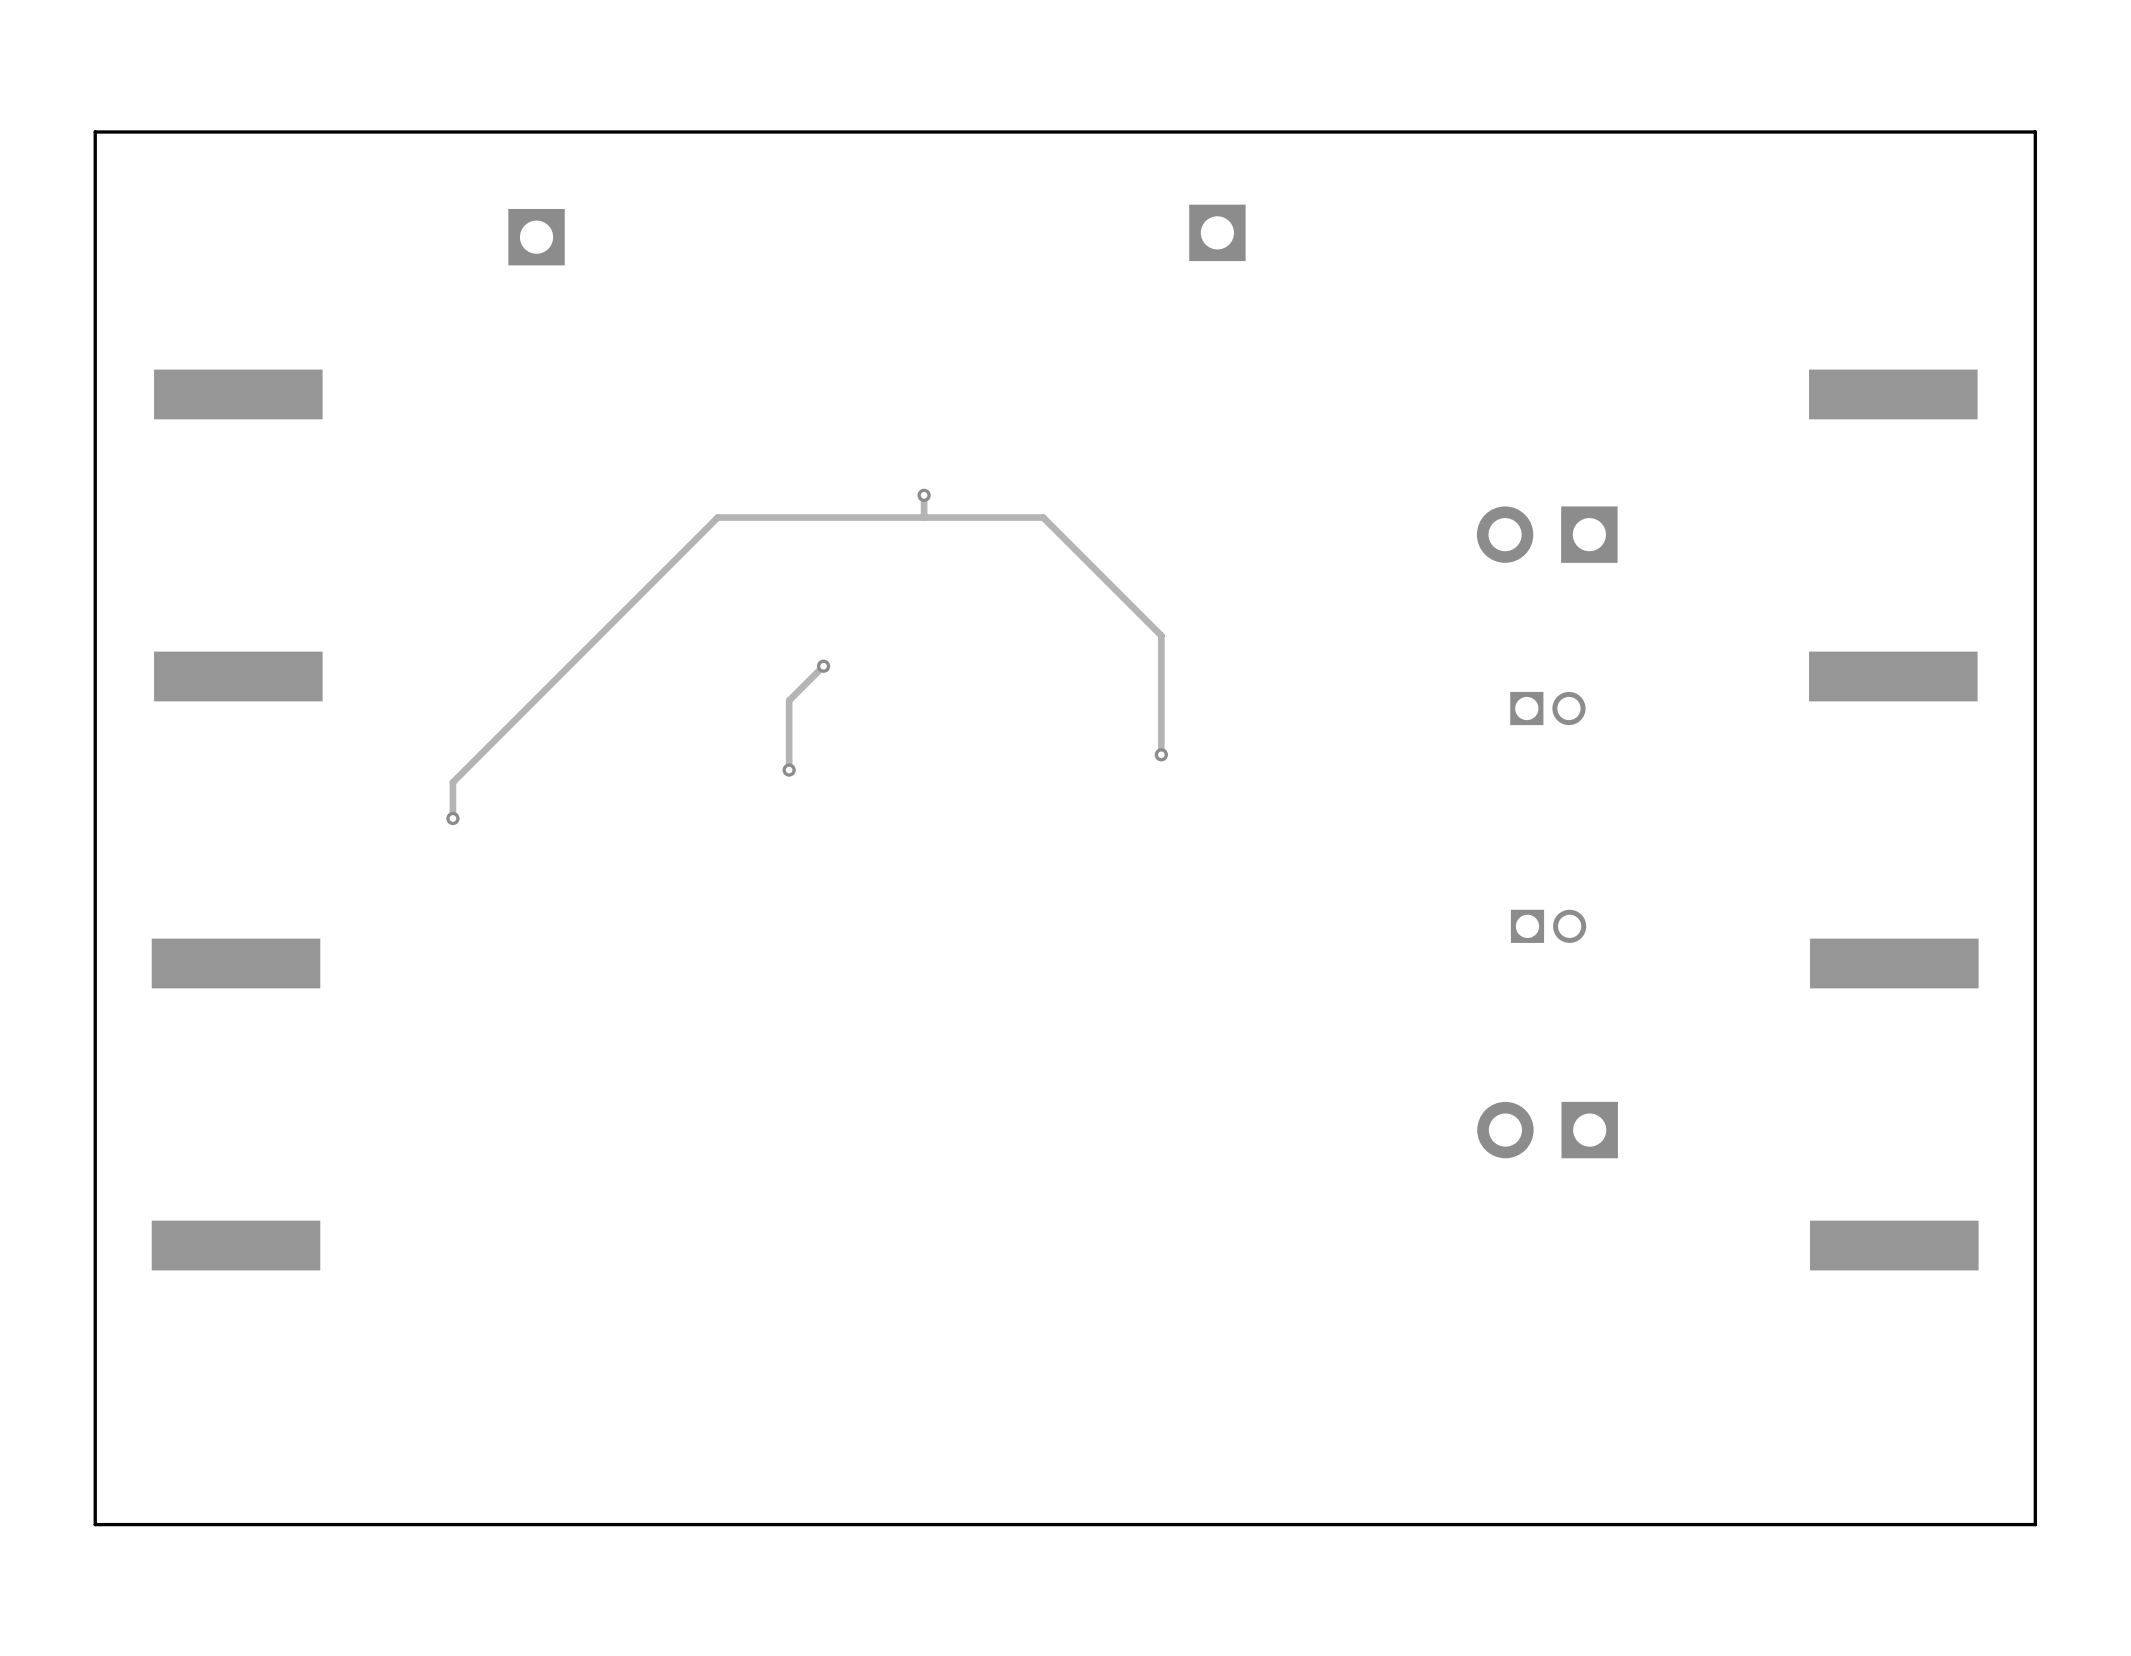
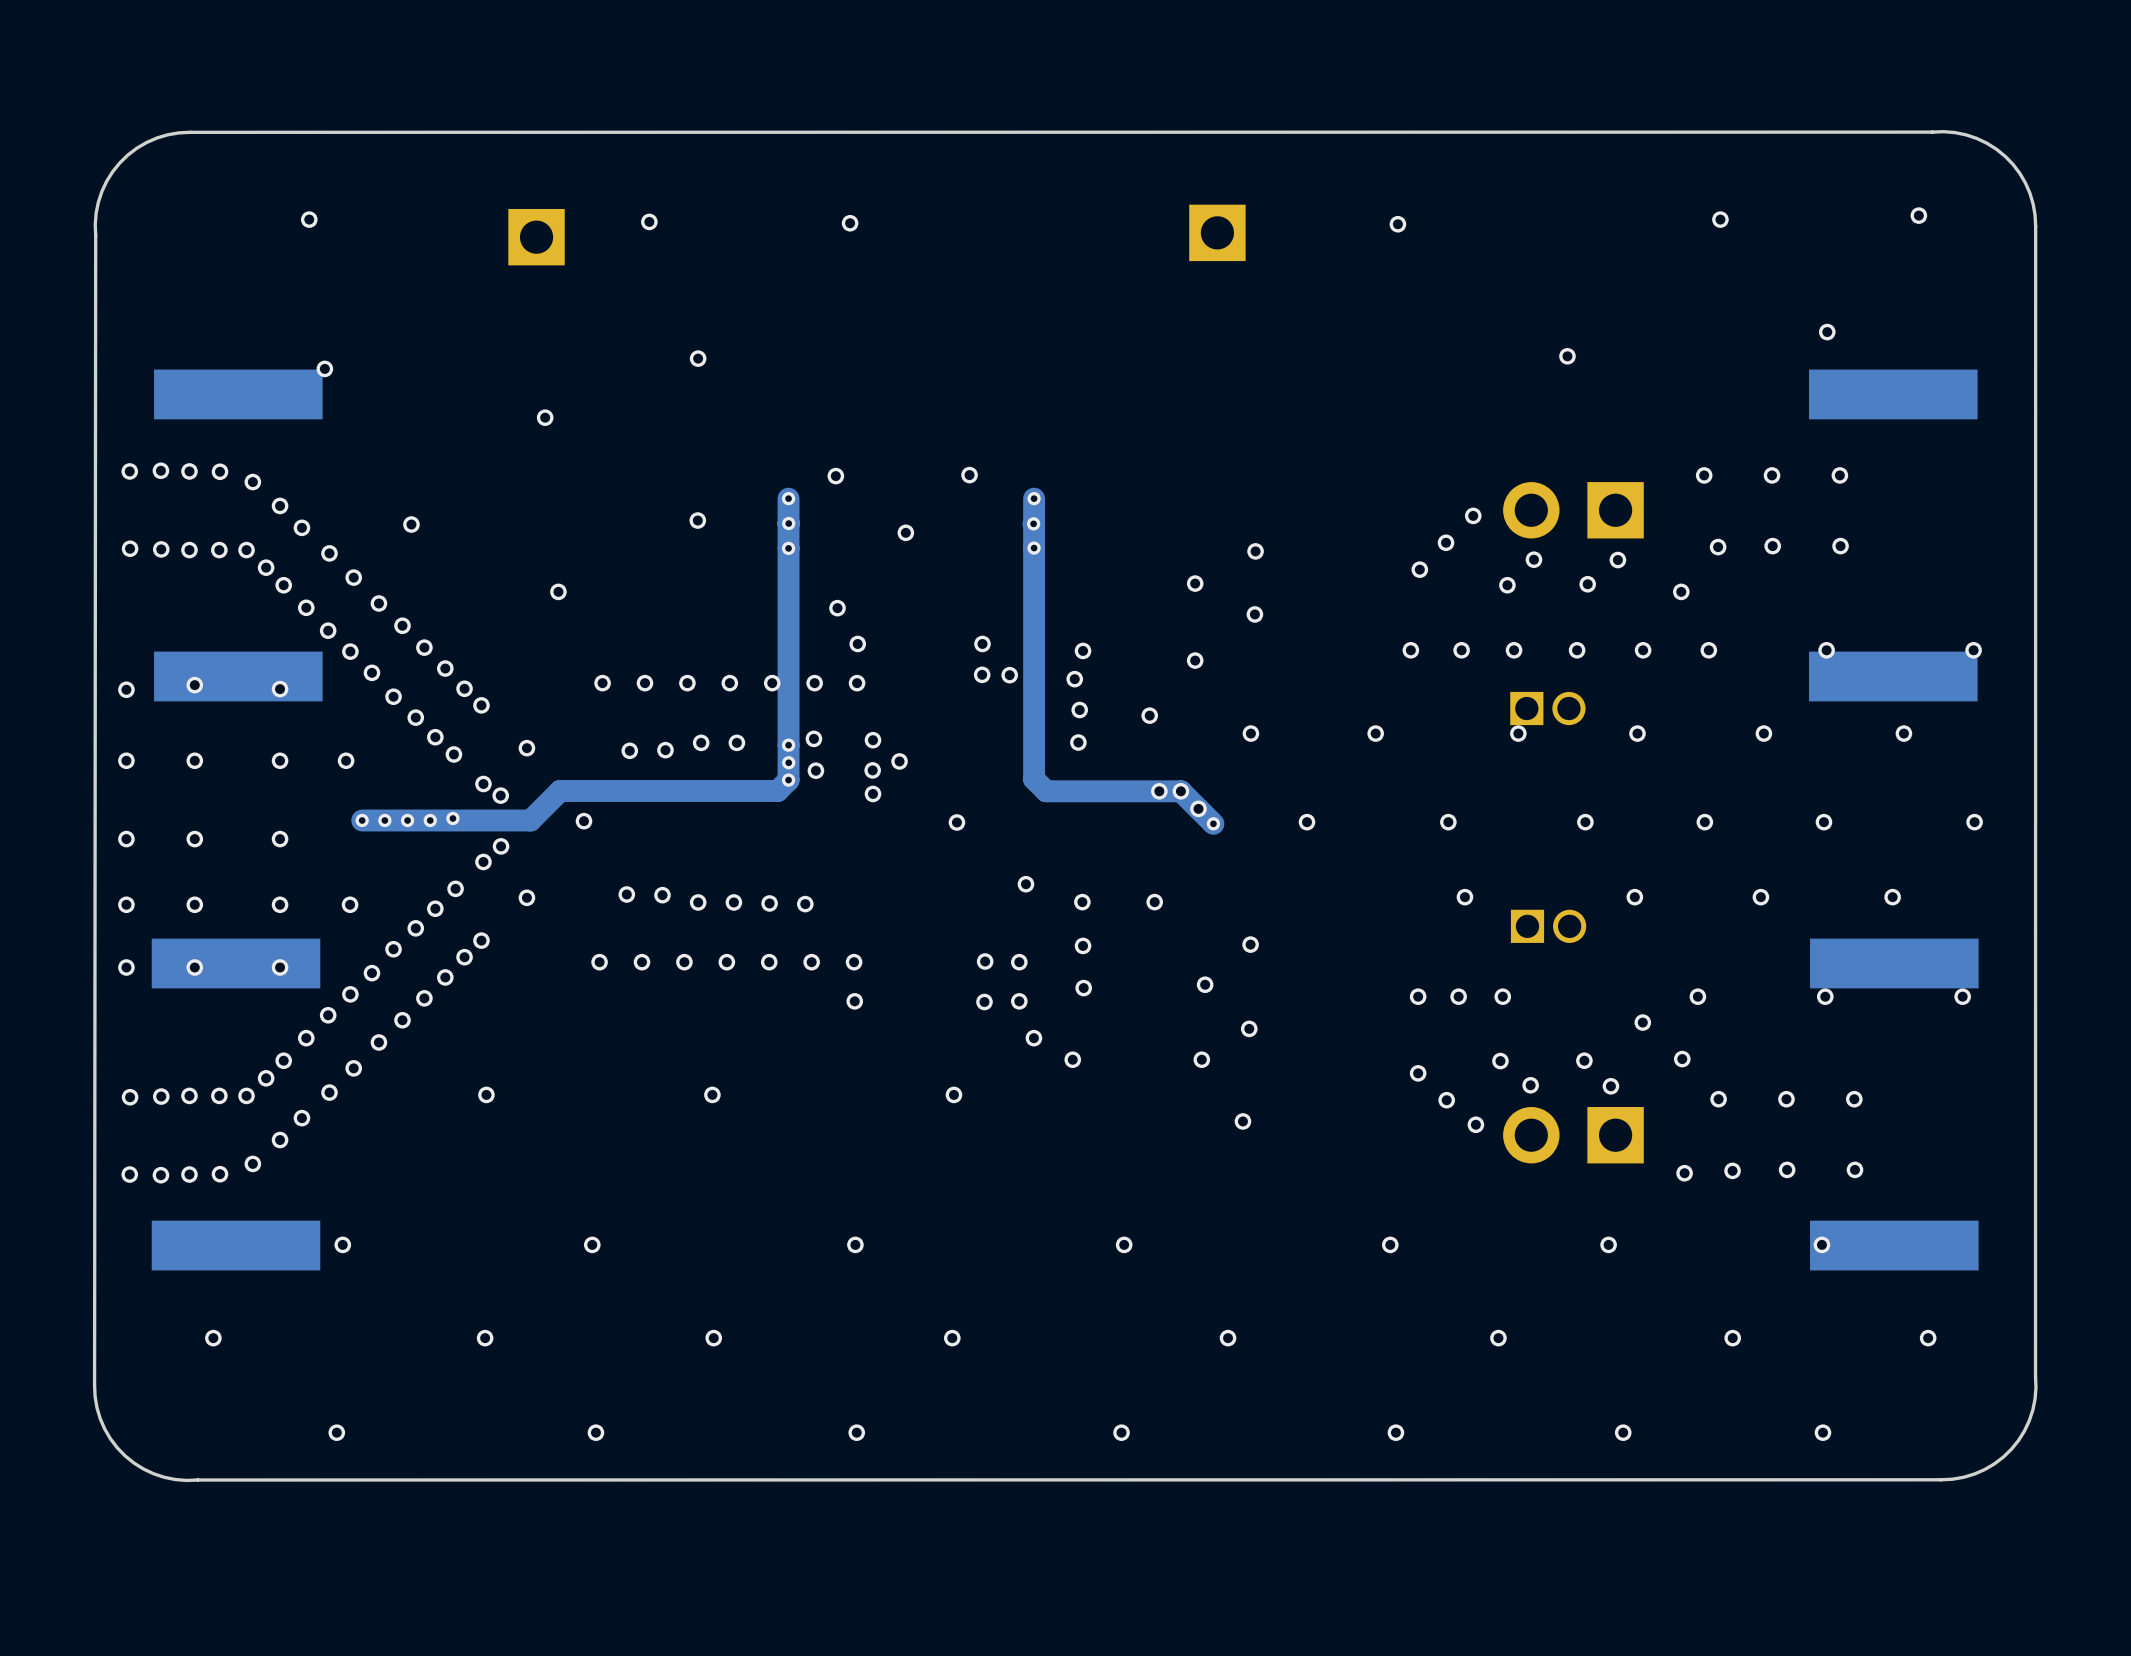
board edge: (2035, 131) (95, 131) (95, 1524) (2035, 1524) (2035, 131) -> (1932, 132) (1954, 132) (1976, 138) (2005, 156) (2025, 183) (2033, 204) (2035, 226) (2035, 1387) (2032, 1410) (2024, 1431) (2011, 1449) (1994, 1463) (1963, 1477) (1941, 1479) (186, 1480) (164, 1477) (143, 1468) (125, 1455) (110, 1438) (100, 1418) (94, 1385) (95, 224) (98, 201) (106, 181) (119, 162) (136, 148) (167, 134) (190, 132) (1932, 132)
via: none -> (1918, 215)
via: none -> (309, 219)
via: none -> (1720, 219)
via: none -> (649, 221)
via: none -> (850, 223)
via: none -> (1397, 224)
via: none -> (1827, 332)
via: none -> (1567, 356)
via: none -> (698, 358)
via: none -> (324, 368)
via: none -> (545, 417)
via: none -> (160, 470)
via: none -> (129, 471)
via: none -> (189, 471)
via: none -> (220, 471)
via: none -> (969, 475)
via: none -> (1704, 475)
via: none -> (1772, 475)
via: none -> (1839, 475)
via: none -> (835, 476)
via: none -> (252, 482)
track: (924, 495) (924, 517) -> none
via: (924, 495) -> none
track: none -> (788, 498) (788, 780) (777, 790) (560, 790) (530, 820) (362, 820)
via: none -> (788, 498)
track: none -> (1034, 498) (1034, 779) (1046, 791) (1180, 791) (1213, 823)
via: none -> (1034, 498)
via: none -> (280, 505)
via: none -> (1473, 515)
via: none -> (697, 520)
via: none -> (788, 523)
via: none -> (1033, 523)
via: none -> (411, 524)
via: none -> (301, 527)
via: none -> (905, 532)
part position: (1547, 534) -> (1573, 510)
via: none -> (1446, 542)
via: none -> (1772, 546)
via: none -> (1840, 546)
via: none -> (1718, 547)
via: none -> (130, 548)
via: none -> (788, 548)
via: none -> (1034, 548)
via: none -> (161, 549)
via: none -> (189, 550)
via: none -> (219, 550)
via: none -> (246, 550)
via: none -> (1255, 551)
via: none -> (329, 553)
via: none -> (1533, 559)
via: none -> (1617, 560)
via: none -> (266, 567)
via: none -> (1419, 569)
via: none -> (353, 577)
via: none -> (1195, 583)
via: none -> (1587, 584)
via: none -> (283, 585)
via: none -> (1507, 585)
via: none -> (558, 591)
via: none -> (1681, 591)
via: none -> (378, 603)
via: none -> (306, 607)
via: none -> (837, 608)
via: none -> (1254, 614)
via: none -> (402, 625)
via: none -> (328, 630)
via: none -> (857, 643)
via: none -> (982, 643)
via: none -> (424, 647)
via: none -> (1083, 650)
via: none -> (1410, 650)
via: none -> (1461, 650)
via: none -> (1514, 650)
via: none -> (1577, 650)
via: none -> (1643, 650)
via: none -> (1708, 650)
via: none -> (1826, 650)
via: none -> (1973, 650)
via: none -> (350, 651)
via: none -> (1195, 660)
track: (823, 666) (789, 700) (789, 770) -> none
via: (823, 666) -> none
via: none -> (445, 668)
via: none -> (371, 672)
via: none -> (982, 674)
via: none -> (1009, 675)
via: none -> (1074, 679)
via: none -> (602, 683)
via: none -> (644, 683)
via: none -> (687, 683)
via: none -> (729, 683)
via: none -> (772, 683)
via: none -> (814, 683)
via: none -> (857, 683)
via: none -> (194, 685)
via: none -> (464, 688)
via: none -> (126, 689)
via: none -> (280, 689)
via: none -> (393, 696)
via: none -> (481, 705)
via: none -> (1079, 710)
via: none -> (1149, 715)
via: none -> (415, 717)
via: none -> (1250, 733)
via: none -> (1375, 733)
via: none -> (1518, 733)
via: none -> (1637, 733)
via: none -> (1763, 733)
via: none -> (1903, 733)
via: none -> (435, 737)
via: none -> (813, 738)
via: none -> (873, 740)
via: none -> (701, 742)
via: none -> (736, 742)
via: none -> (1078, 742)
via: none -> (788, 745)
via: none -> (526, 748)
via: none -> (629, 750)
via: none -> (665, 750)
via: none -> (453, 754)
track: (1161, 754) (1161, 635) (1043, 517) (717, 517) (452, 782) (452, 818) -> none
via position: (1161, 754) -> (1213, 823)
via: none -> (126, 760)
via: none -> (194, 760)
via: none -> (280, 760)
via: none -> (346, 760)
via: none -> (899, 761)
via: none -> (788, 762)
via: (789, 770) -> none
via: none -> (815, 770)
via: none -> (872, 770)
via: none -> (788, 780)
via: none -> (483, 784)
via: none -> (1159, 791)
via: none -> (1180, 791)
via: none -> (873, 793)
via: none -> (500, 795)
via: none -> (1198, 808)
via: none -> (362, 820)
via: none -> (384, 820)
via: none -> (407, 820)
via: none -> (430, 820)
via: none -> (583, 821)
via: none -> (956, 822)
via: none -> (1307, 822)
via: none -> (1448, 822)
via: none -> (1585, 822)
via: none -> (1704, 822)
via: none -> (1823, 822)
via: none -> (1974, 822)
via: none -> (126, 839)
via: none -> (194, 839)
via: none -> (280, 839)
via: none -> (501, 846)
via: none -> (483, 861)
via: none -> (1025, 884)
via: none -> (455, 888)
via: none -> (626, 894)
via: none -> (662, 895)
via: none -> (526, 897)
via: none -> (1464, 897)
via: none -> (1634, 897)
via: none -> (1760, 897)
via: none -> (1892, 897)
via: none -> (698, 902)
via: none -> (733, 902)
via: none -> (1082, 902)
via: none -> (1154, 902)
via: none -> (769, 903)
via: none -> (126, 904)
via: none -> (194, 904)
via: none -> (280, 904)
via: none -> (350, 904)
via: none -> (805, 904)
via: none -> (435, 908)
via: none -> (415, 928)
via: none -> (481, 940)
via: none -> (1250, 944)
via: none -> (1083, 945)
via: none -> (393, 949)
via: none -> (464, 957)
via: none -> (985, 961)
via: none -> (599, 962)
via: none -> (642, 962)
via: none -> (684, 962)
via: none -> (726, 962)
via: none -> (769, 962)
via: none -> (811, 962)
via: none -> (854, 962)
via: none -> (1019, 962)
via: none -> (126, 967)
via: none -> (194, 967)
via: none -> (280, 967)
via: none -> (371, 973)
via: none -> (445, 977)
via: none -> (1205, 984)
via: none -> (1083, 988)
via: none -> (350, 994)
via: none -> (1418, 996)
via: none -> (1458, 996)
via: none -> (1502, 996)
via: none -> (1697, 996)
via: none -> (1825, 996)
via: none -> (1962, 996)
via: none -> (424, 998)
via: none -> (854, 1001)
via: none -> (1019, 1001)
via: none -> (984, 1002)
via: none -> (328, 1015)
via: none -> (402, 1020)
via: none -> (1642, 1022)
via: none -> (1249, 1028)
via: none -> (306, 1038)
via: none -> (1033, 1038)
via: none -> (378, 1042)
via: none -> (1072, 1059)
via: none -> (1201, 1059)
via: none -> (1682, 1059)
via: none -> (283, 1060)
via: none -> (1584, 1060)
via: none -> (1500, 1061)
via: none -> (353, 1068)
via: none -> (1418, 1073)
via: none -> (266, 1078)
via: none -> (1530, 1085)
via: none -> (1610, 1086)
via: none -> (329, 1092)
via: none -> (486, 1094)
via: none -> (712, 1094)
via: none -> (953, 1094)
via: none -> (189, 1095)
via: none -> (219, 1095)
via: none -> (246, 1095)
via: none -> (161, 1096)
via: none -> (130, 1097)
via: none -> (1718, 1099)
via: none -> (1786, 1099)
via: none -> (1854, 1099)
via: none -> (1446, 1100)
via: none -> (301, 1118)
via: none -> (1242, 1121)
via: none -> (1475, 1124)
part position: (1547, 1130) -> (1573, 1135)
via: none -> (280, 1140)
via: none -> (252, 1163)
via: none -> (1787, 1169)
via: none -> (1854, 1169)
via: none -> (1732, 1170)
via: none -> (1684, 1173)
via: none -> (129, 1174)
via: none -> (189, 1174)
via: none -> (220, 1174)
via: none -> (160, 1175)
via: none -> (342, 1244)
via: none -> (592, 1244)
via: none -> (855, 1244)
via: none -> (1124, 1244)
via: none -> (1390, 1244)
via: none -> (1608, 1244)
via: none -> (1821, 1244)
via: none -> (213, 1338)
via: none -> (485, 1338)
via: none -> (713, 1338)
via: none -> (952, 1338)
via: none -> (1228, 1338)
via: none -> (1498, 1338)
via: none -> (1732, 1338)
via: none -> (1928, 1338)
via: none -> (336, 1432)
via: none -> (595, 1432)
via: none -> (856, 1432)
via: none -> (1121, 1432)
via: none -> (1395, 1432)
via: none -> (1623, 1432)
via: none -> (1822, 1432)

